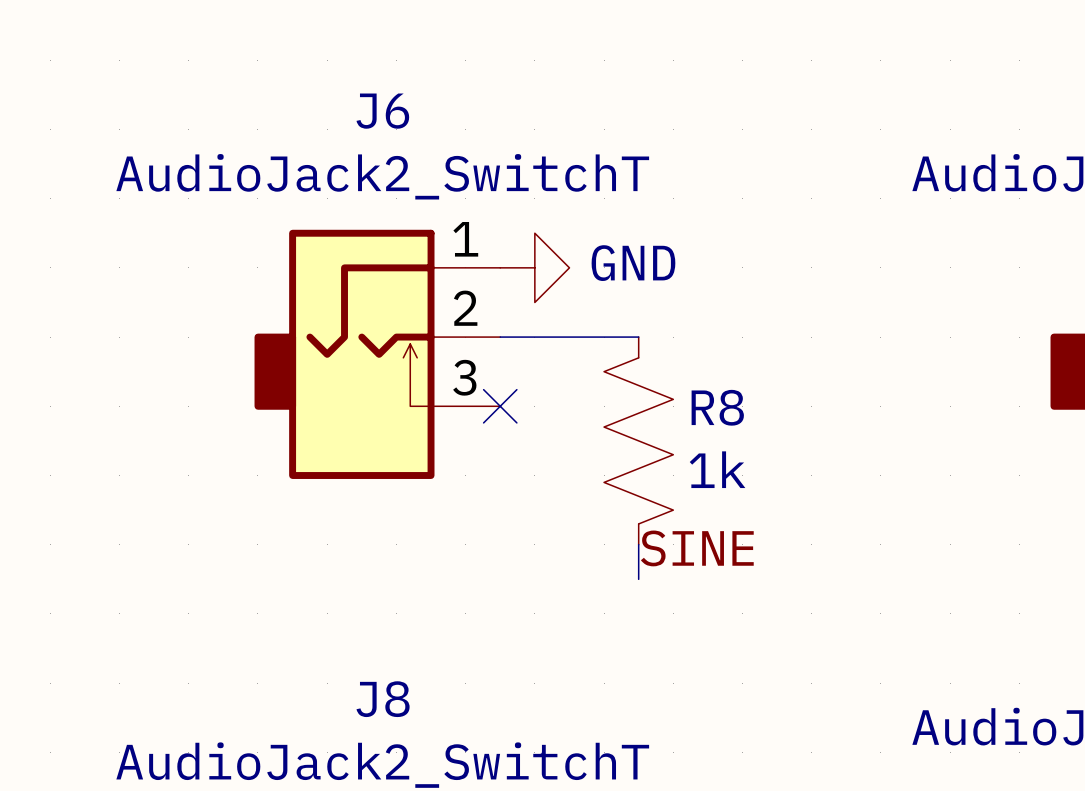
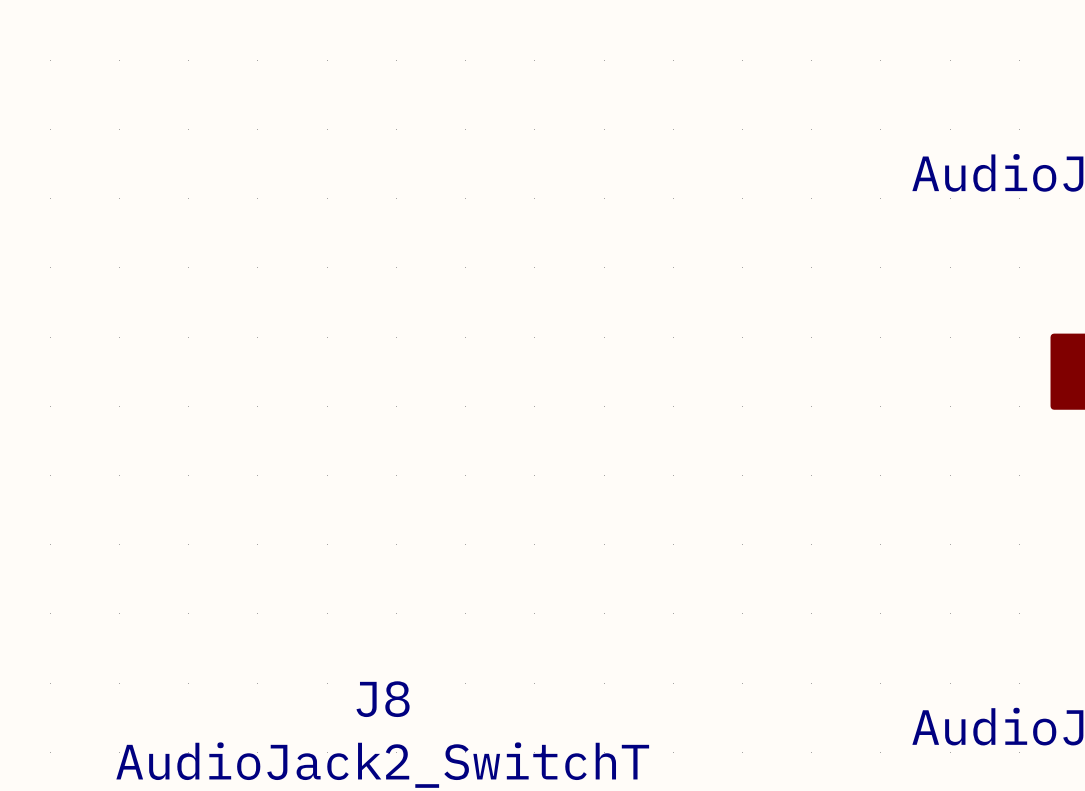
power symbol: GND (534, 267) -> none
wire: (500, 337) (638, 337) -> none
J6: AudioJack2_SwitchT (377, 354) -> none
no-connect mark: (500, 406) -> none
R8: 1k (638, 440) -> none
wire: (638, 544) (638, 579) -> none
label: SINE (697, 548) -> none

